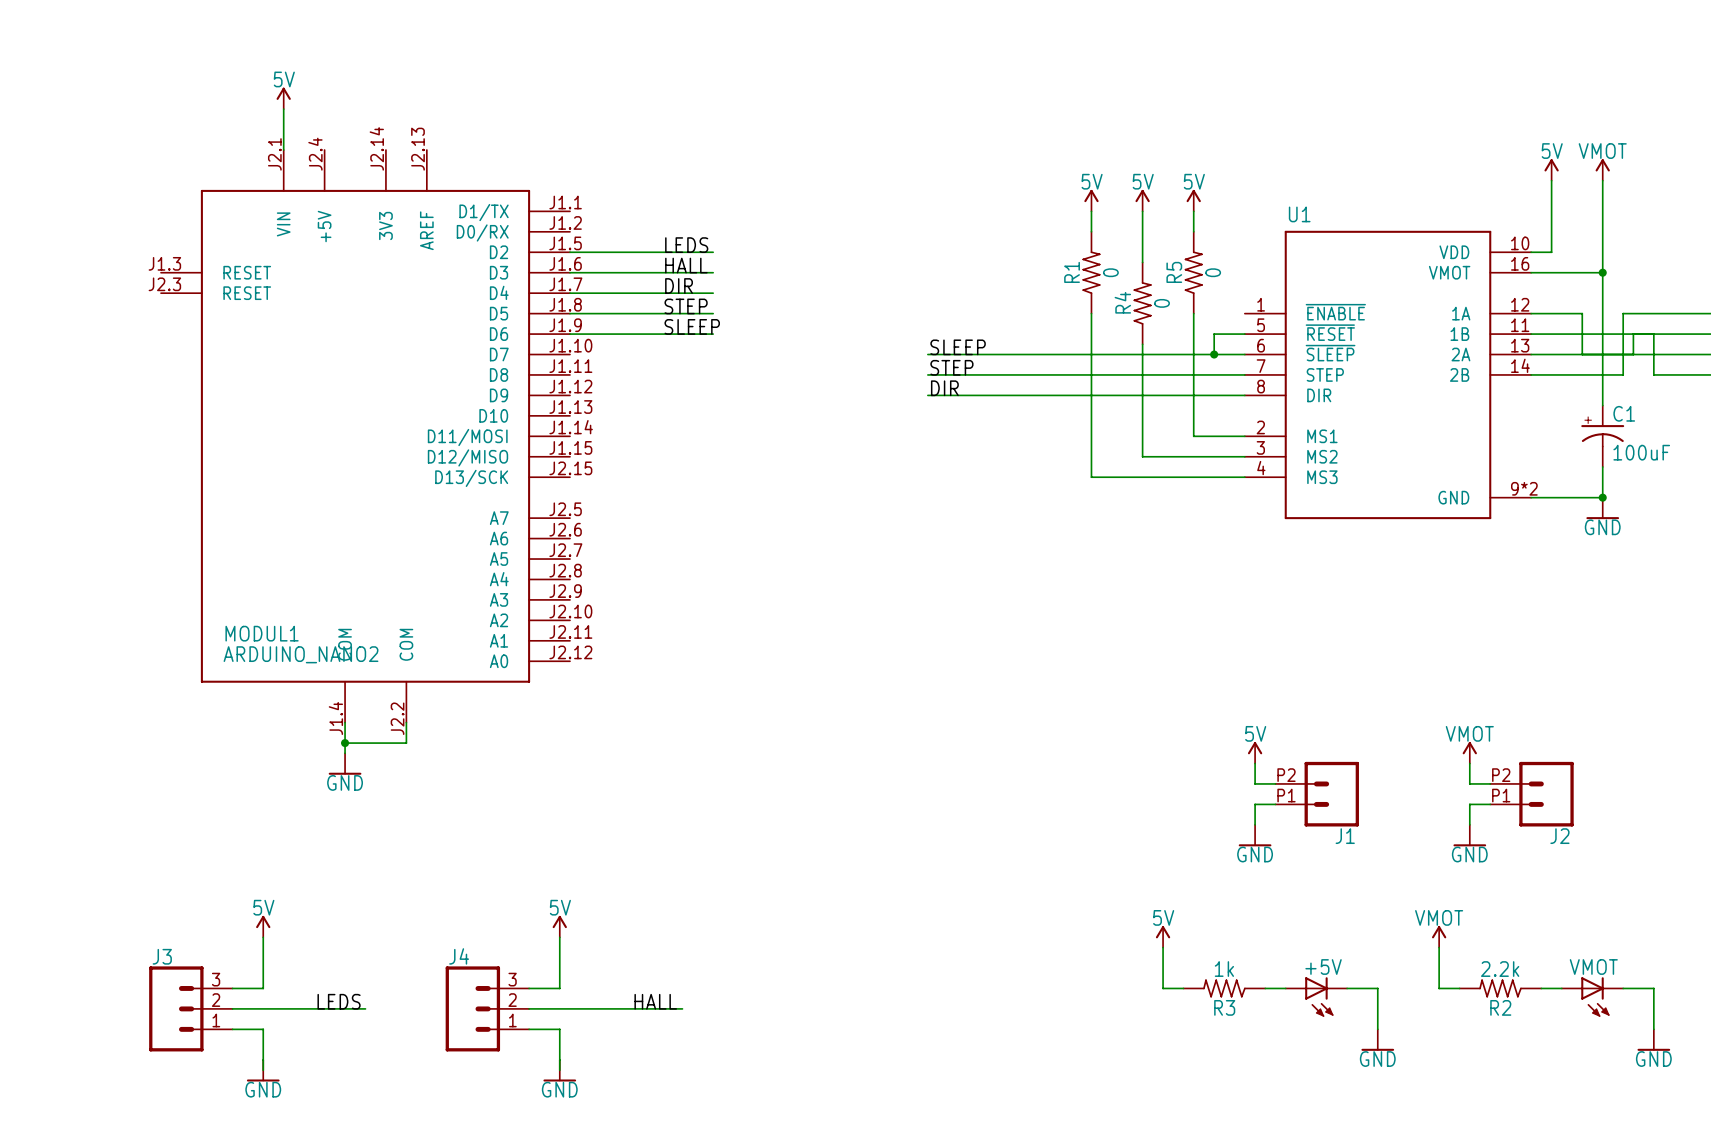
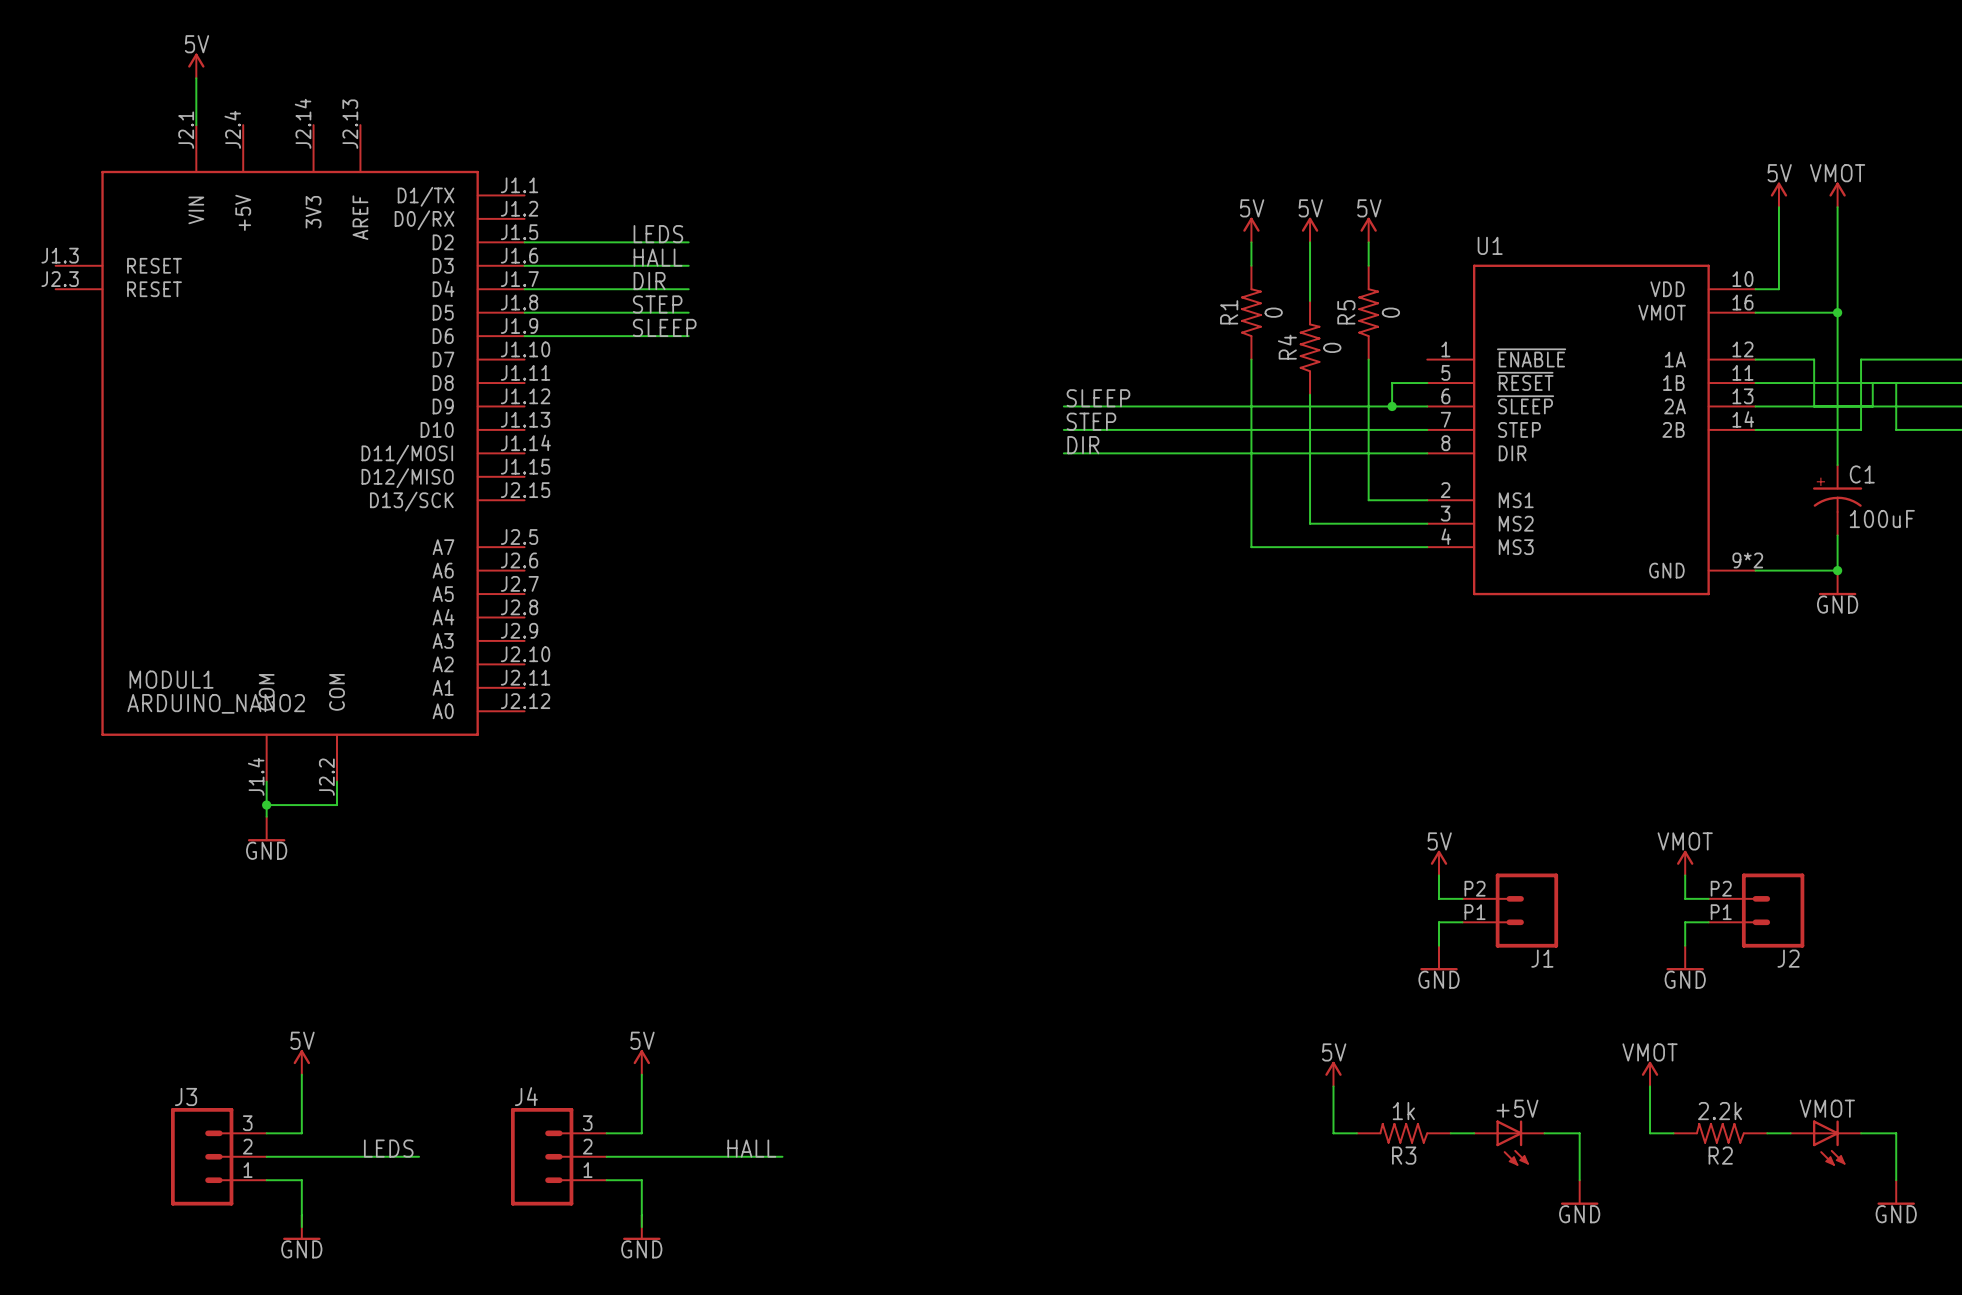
power symbol position: 5V (283, 98) -> 5V (196, 65)
wire: (283, 109) (283, 150) -> (196, 78) (196, 125)
label position: LEDS (686, 245) -> LEDS (658, 234)
wire: (600, 252) (713, 252) -> (524, 289) (653, 289)
label position: HALL (686, 265) -> HALL (658, 257)
wire: (600, 272) (713, 272) -> (524, 312) (653, 312)
label position: DIR (679, 286) -> DIR (649, 281)
wire: (600, 293) (713, 293) -> (524, 336) (653, 336)
label position: STEP (686, 306) -> STEP (657, 304)
wire: (570, 313) (713, 313) -> (524, 242) (688, 242)
label position: SLEEP (692, 326) -> SLEEP (664, 327)
wire: (570, 334) (713, 334) -> (524, 265) (688, 265)
MODUL1 position: (365, 436) -> (290, 453)
junction: none -> (266, 805)
wire: (345, 722) (345, 753) -> (266, 781) (266, 816)
wire: (406, 722) (406, 743) (345, 743) -> (337, 781) (337, 805) (266, 805)
junction: (345, 743) -> none
power symbol position: GND (345, 764) -> GND (266, 829)

